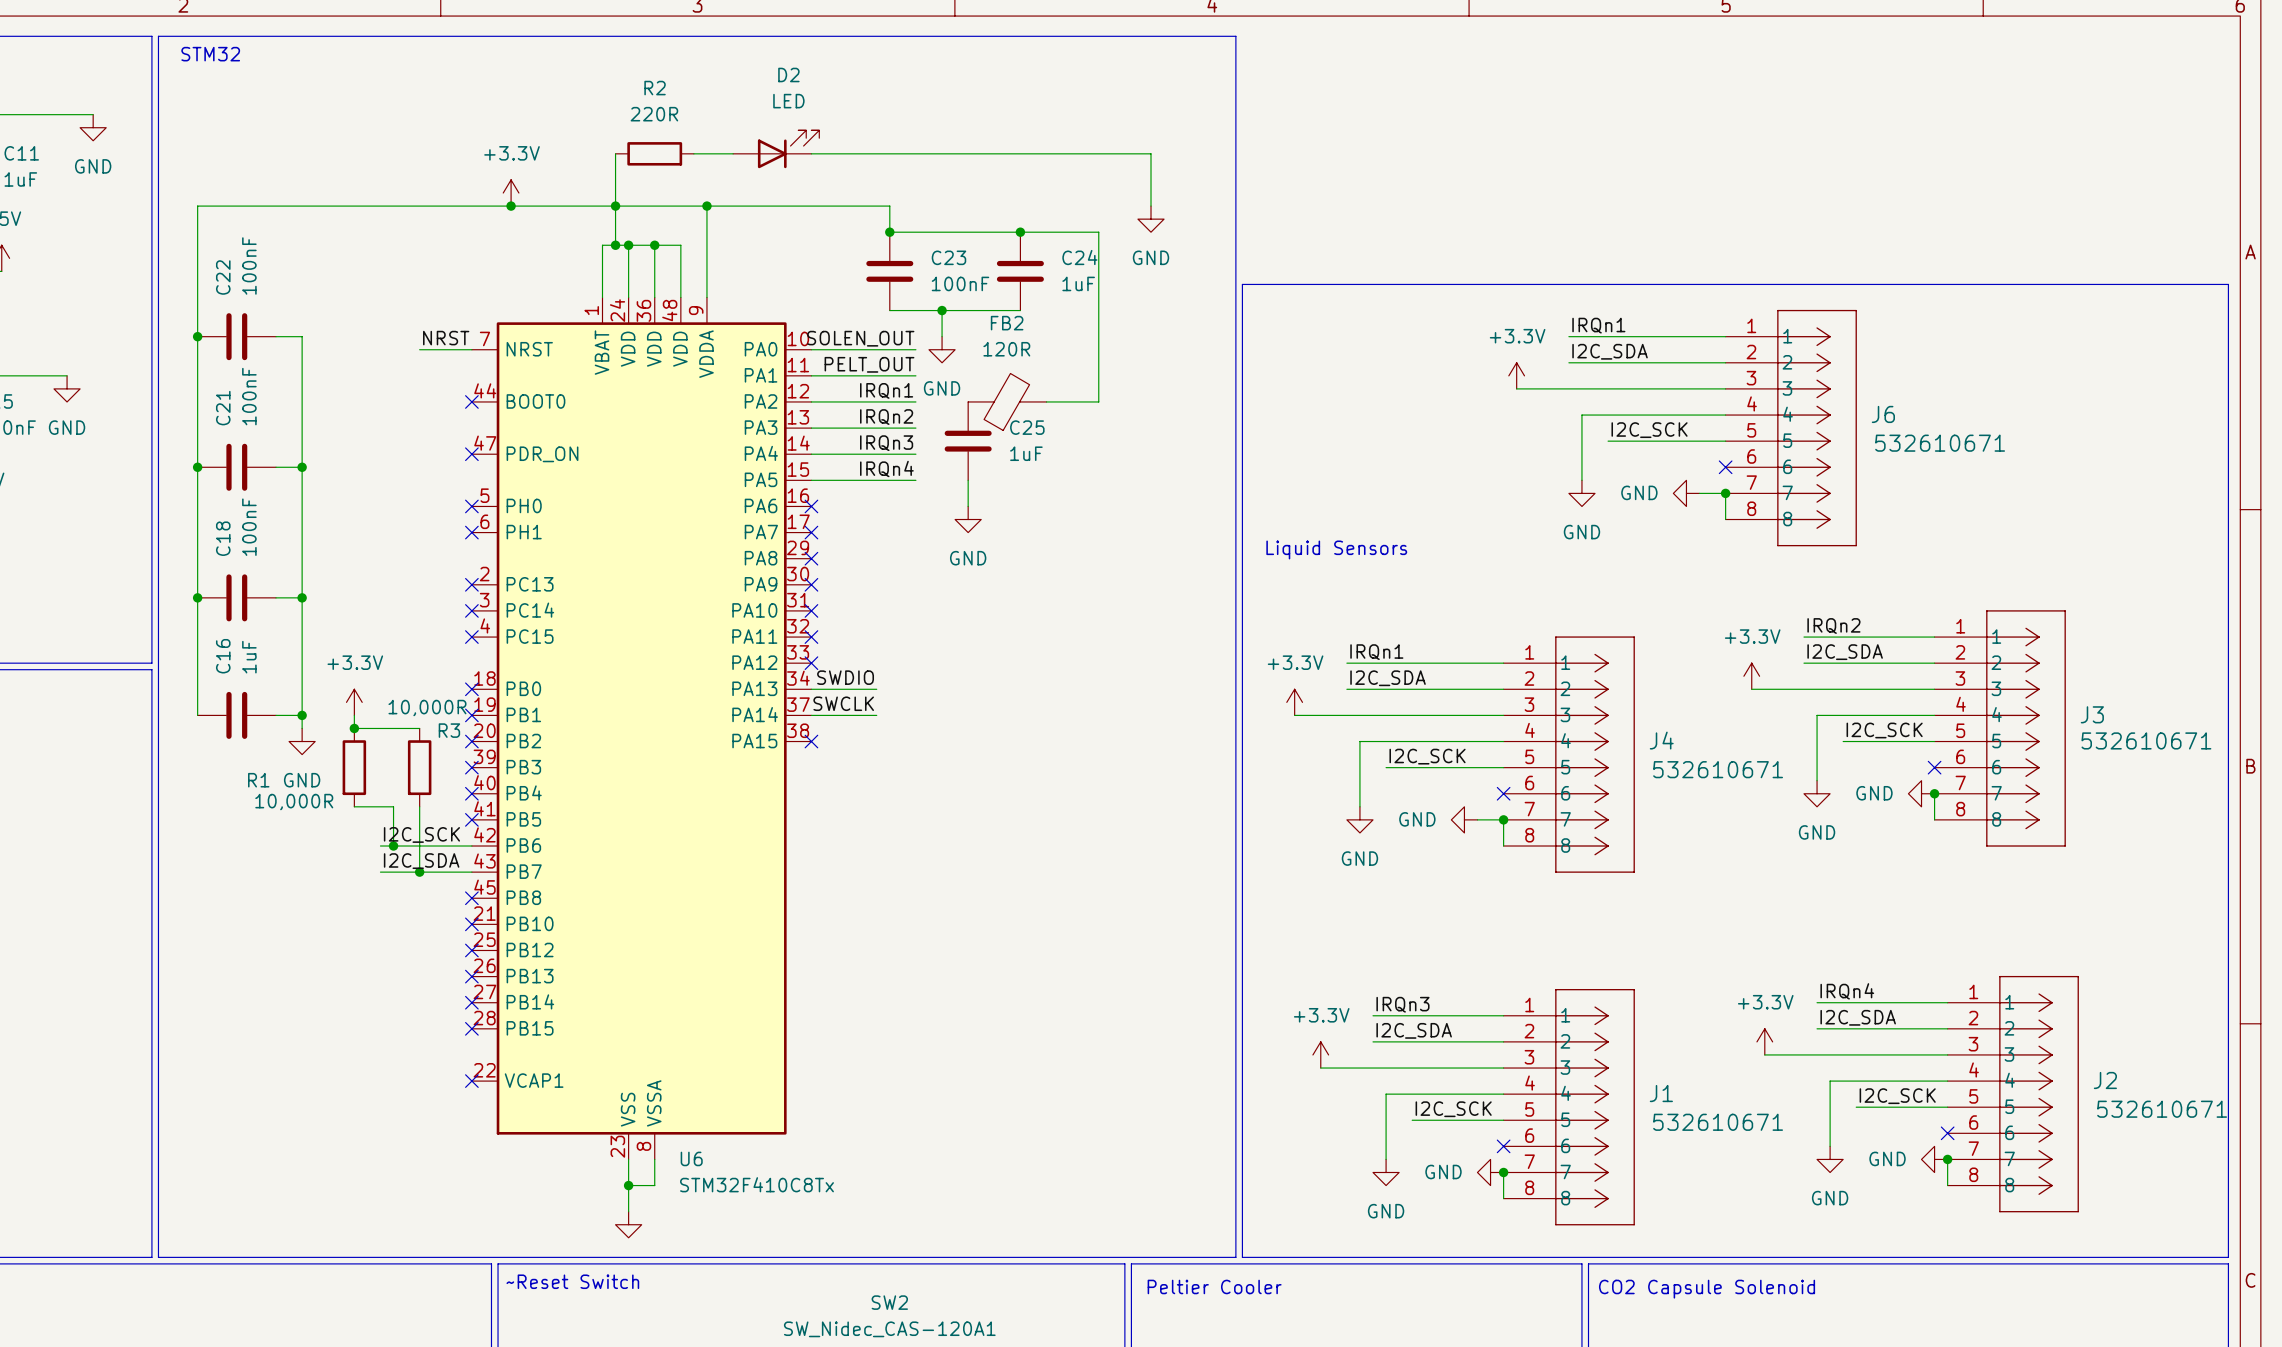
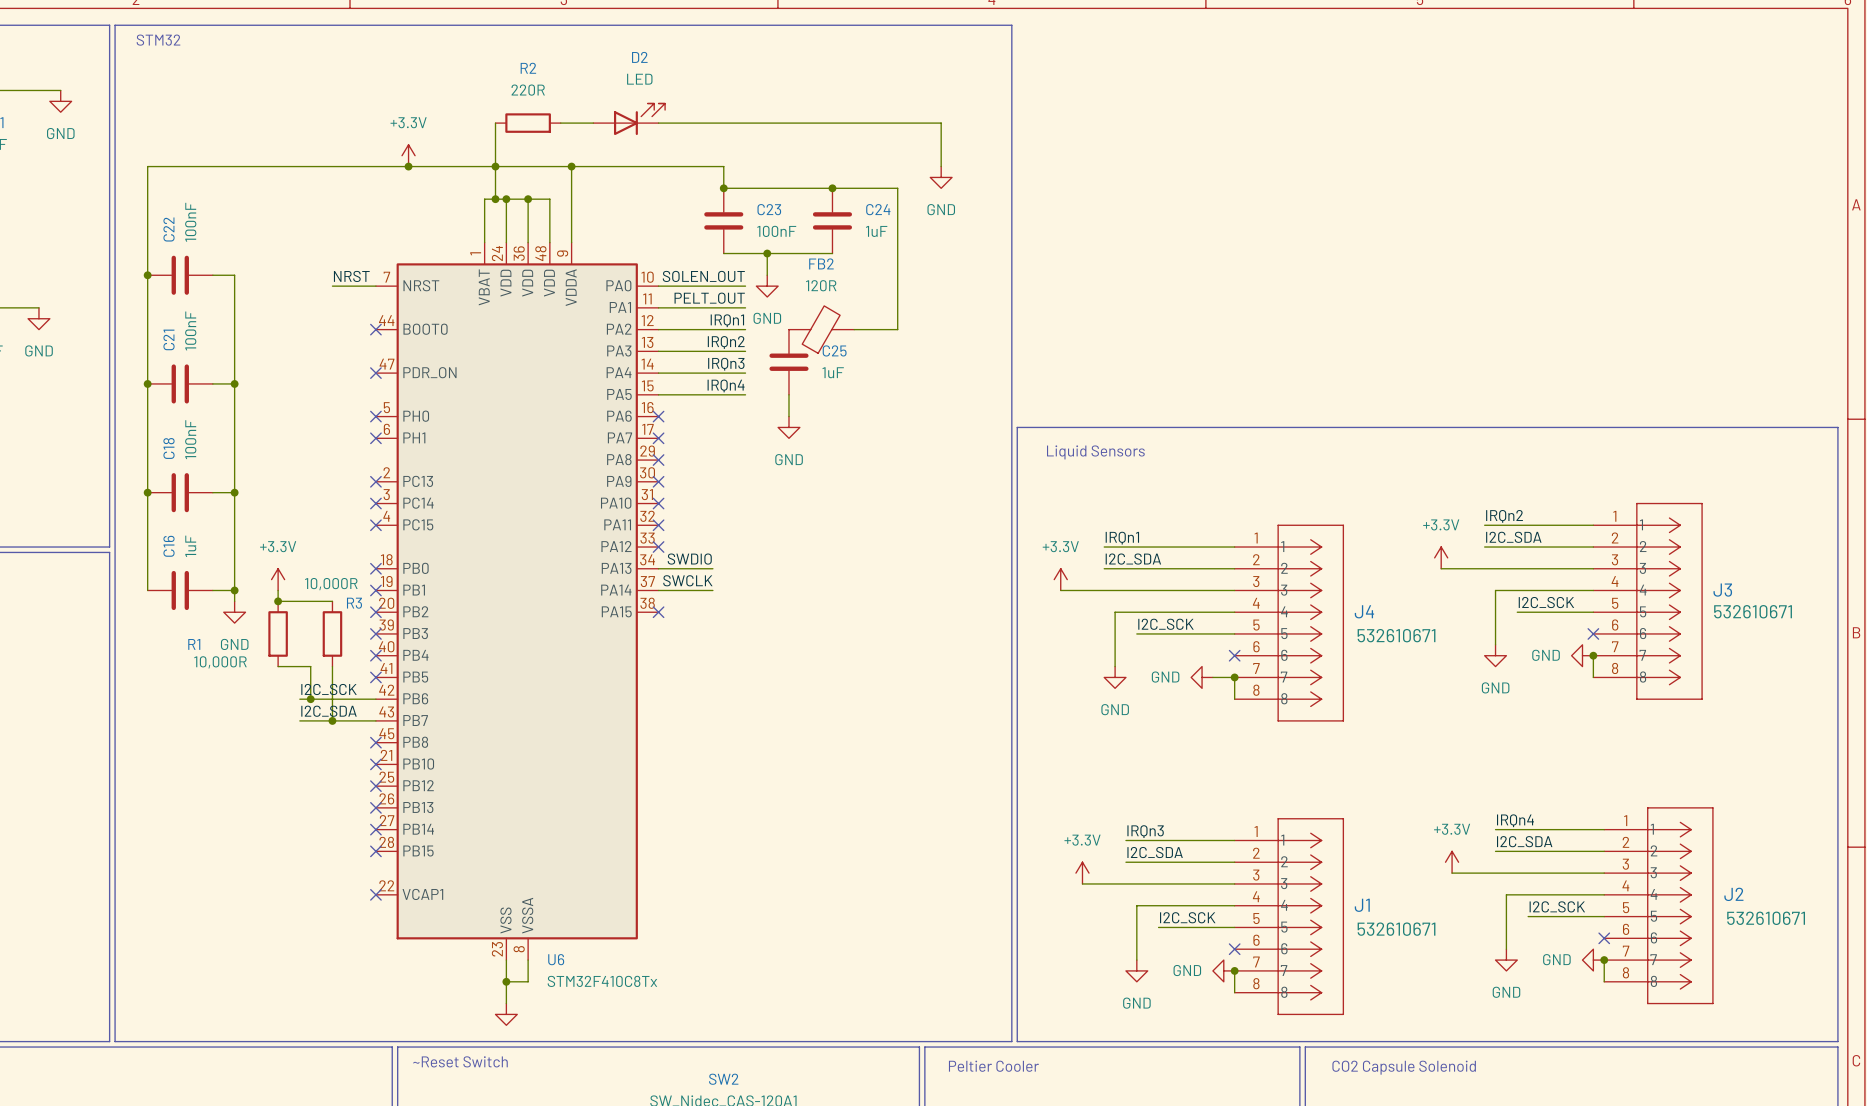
label: IRQn1 (1598, 325) -> none
wire: (1568, 336) (1725, 336) -> none
label: I2C_SDA (1610, 351) -> none
wire: (1568, 362) (1725, 362) -> none
power symbol: +3.3V (1516, 375) -> none
wire: (1516, 388) (1725, 388) -> none
wire: (1725, 415) (1581, 415) (1581, 480) -> none
J6: 532610671 (1791, 428) -> none
label: I2C_SCK (1649, 430) -> none
wire: (1608, 441) (1725, 441) -> none
no-connect mark: (1725, 467) -> none
power symbol: GND (1581, 493) -> none
power symbol: GND (1686, 493) -> none
wire: (1699, 493) (1725, 493) (1725, 519) -> none
junction: (1725, 493) -> none
line: (1242, 519) (1242, 284) (2228, 284) (2228, 519) -> (1017, 427) (1837, 427)

